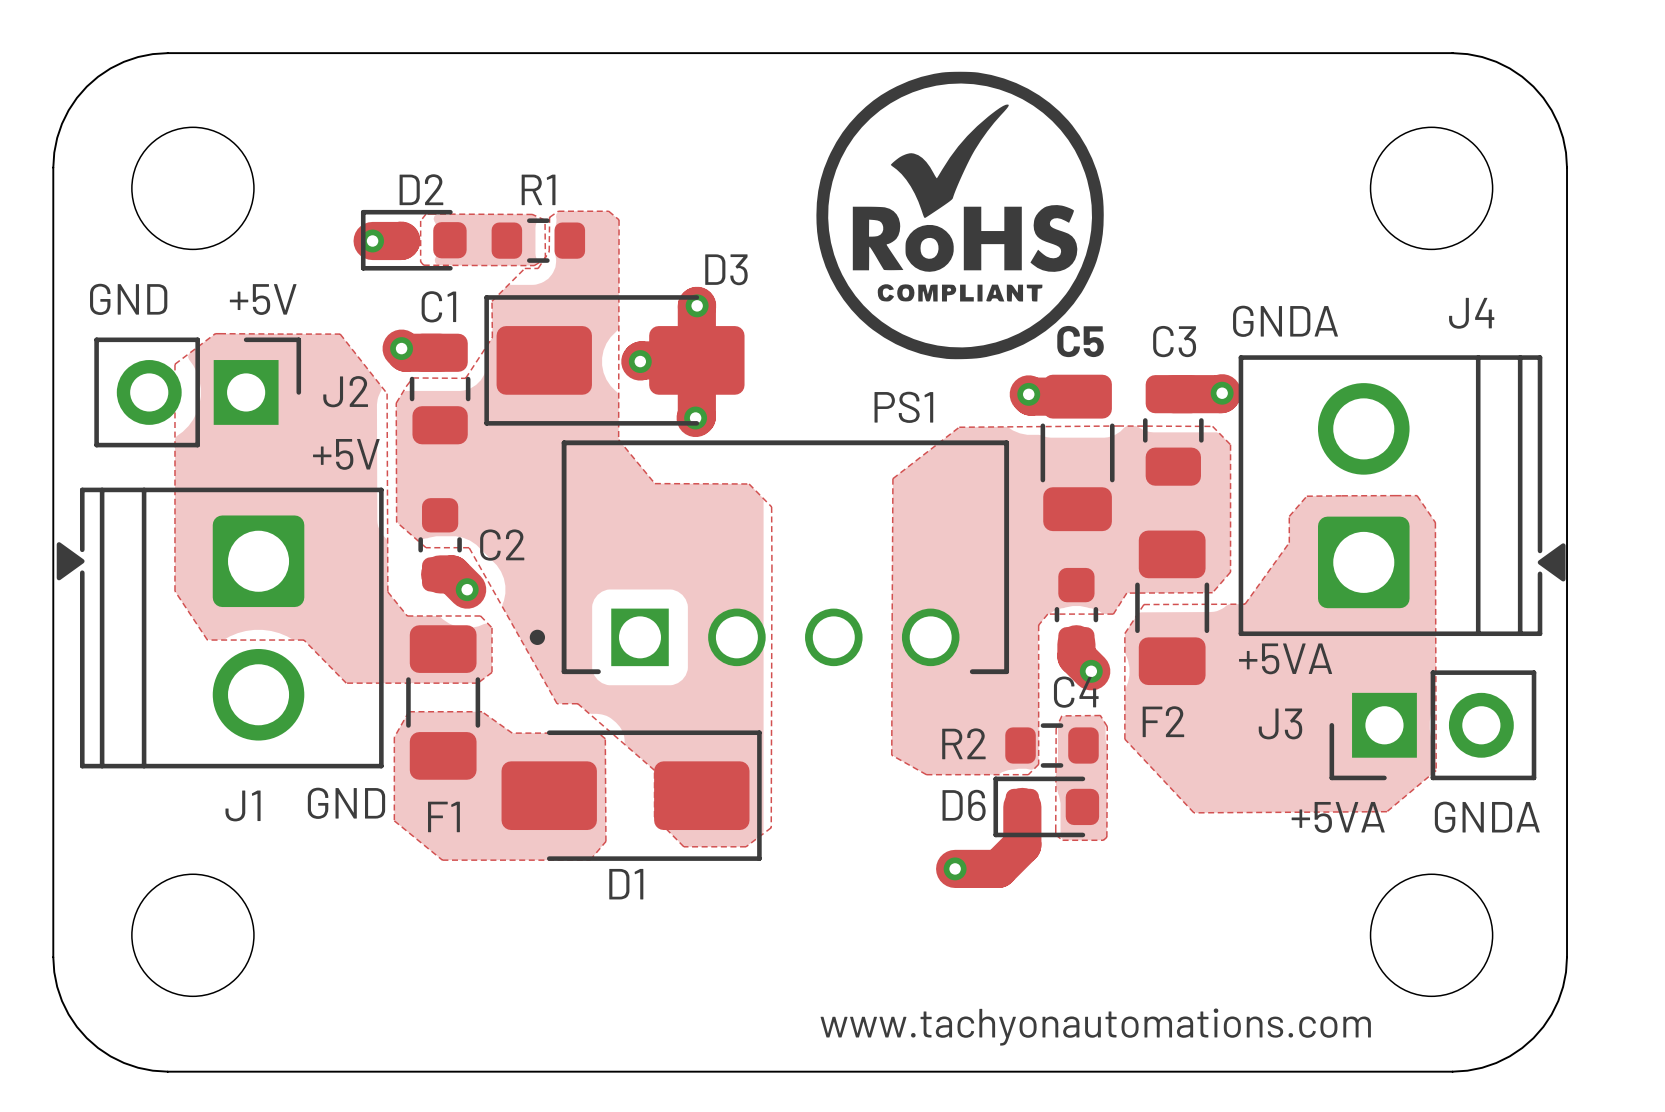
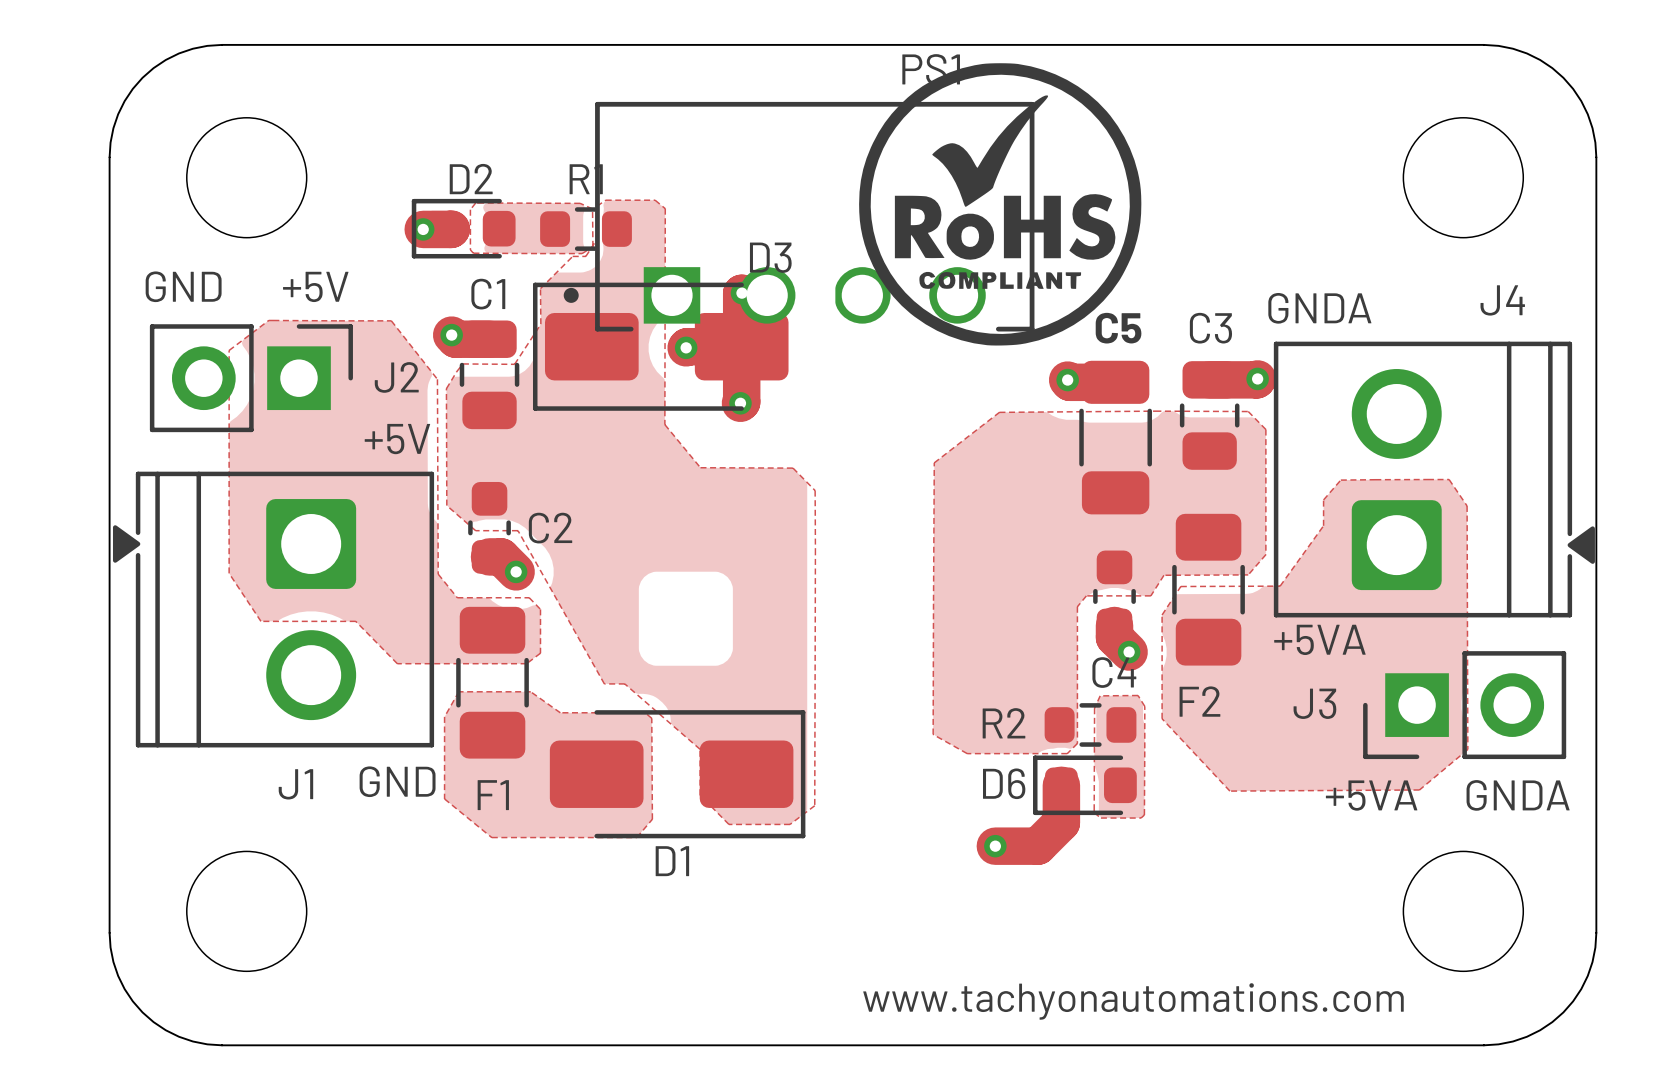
PS1 position: (769, 557) -> (799, 216)

